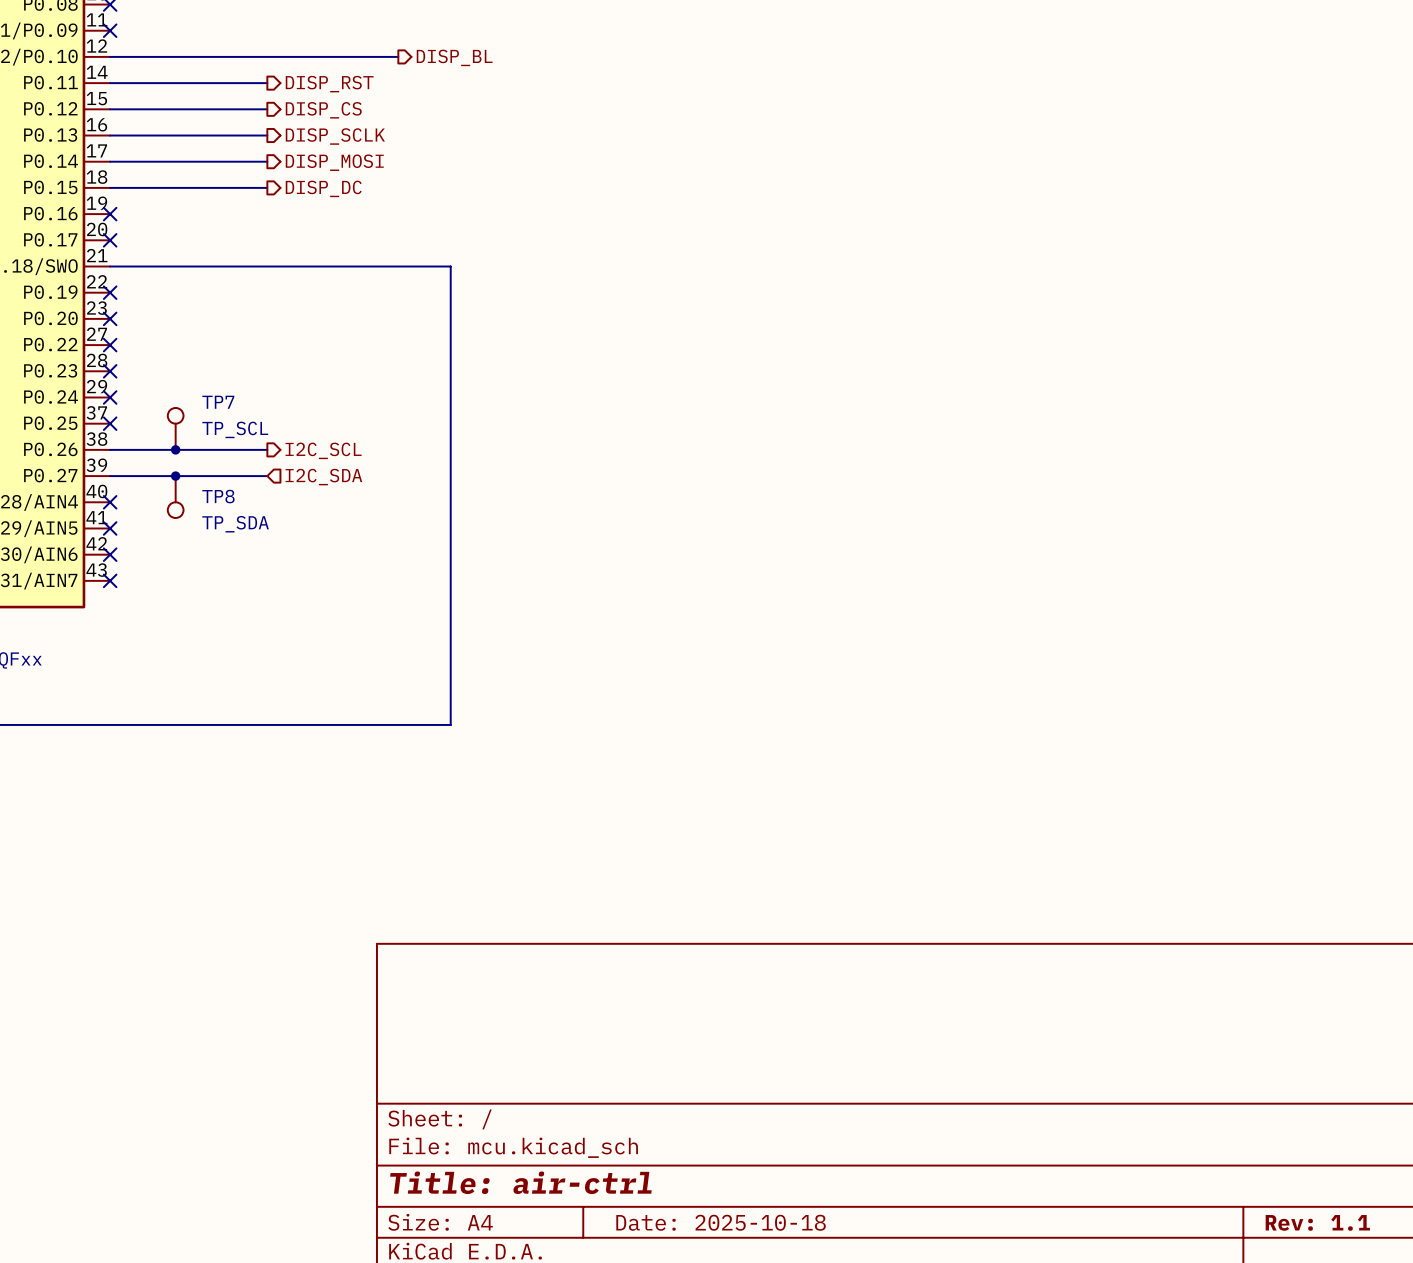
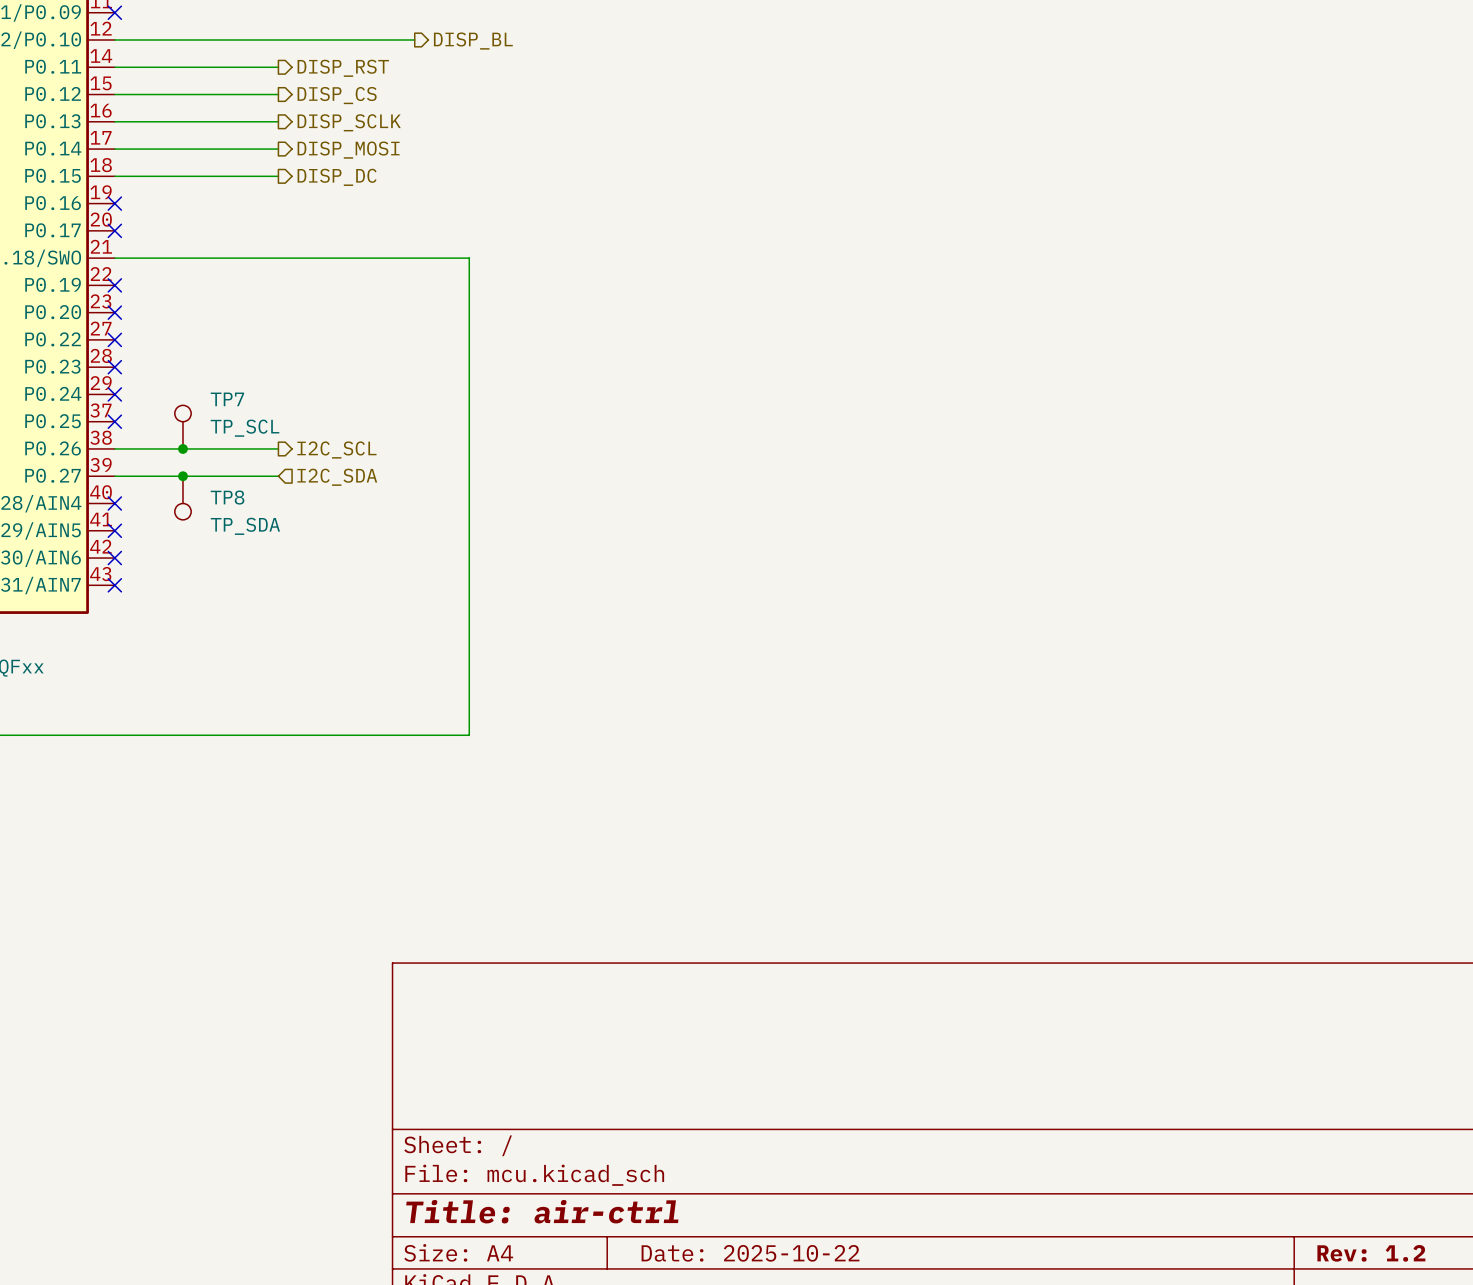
title block: Date: 2025-10-18 (721, 1222) -> Date: 2025-10-22 (750, 1253)
title block: Rev: 1.1 (1317, 1222) -> Rev: 1.2 (1371, 1253)

